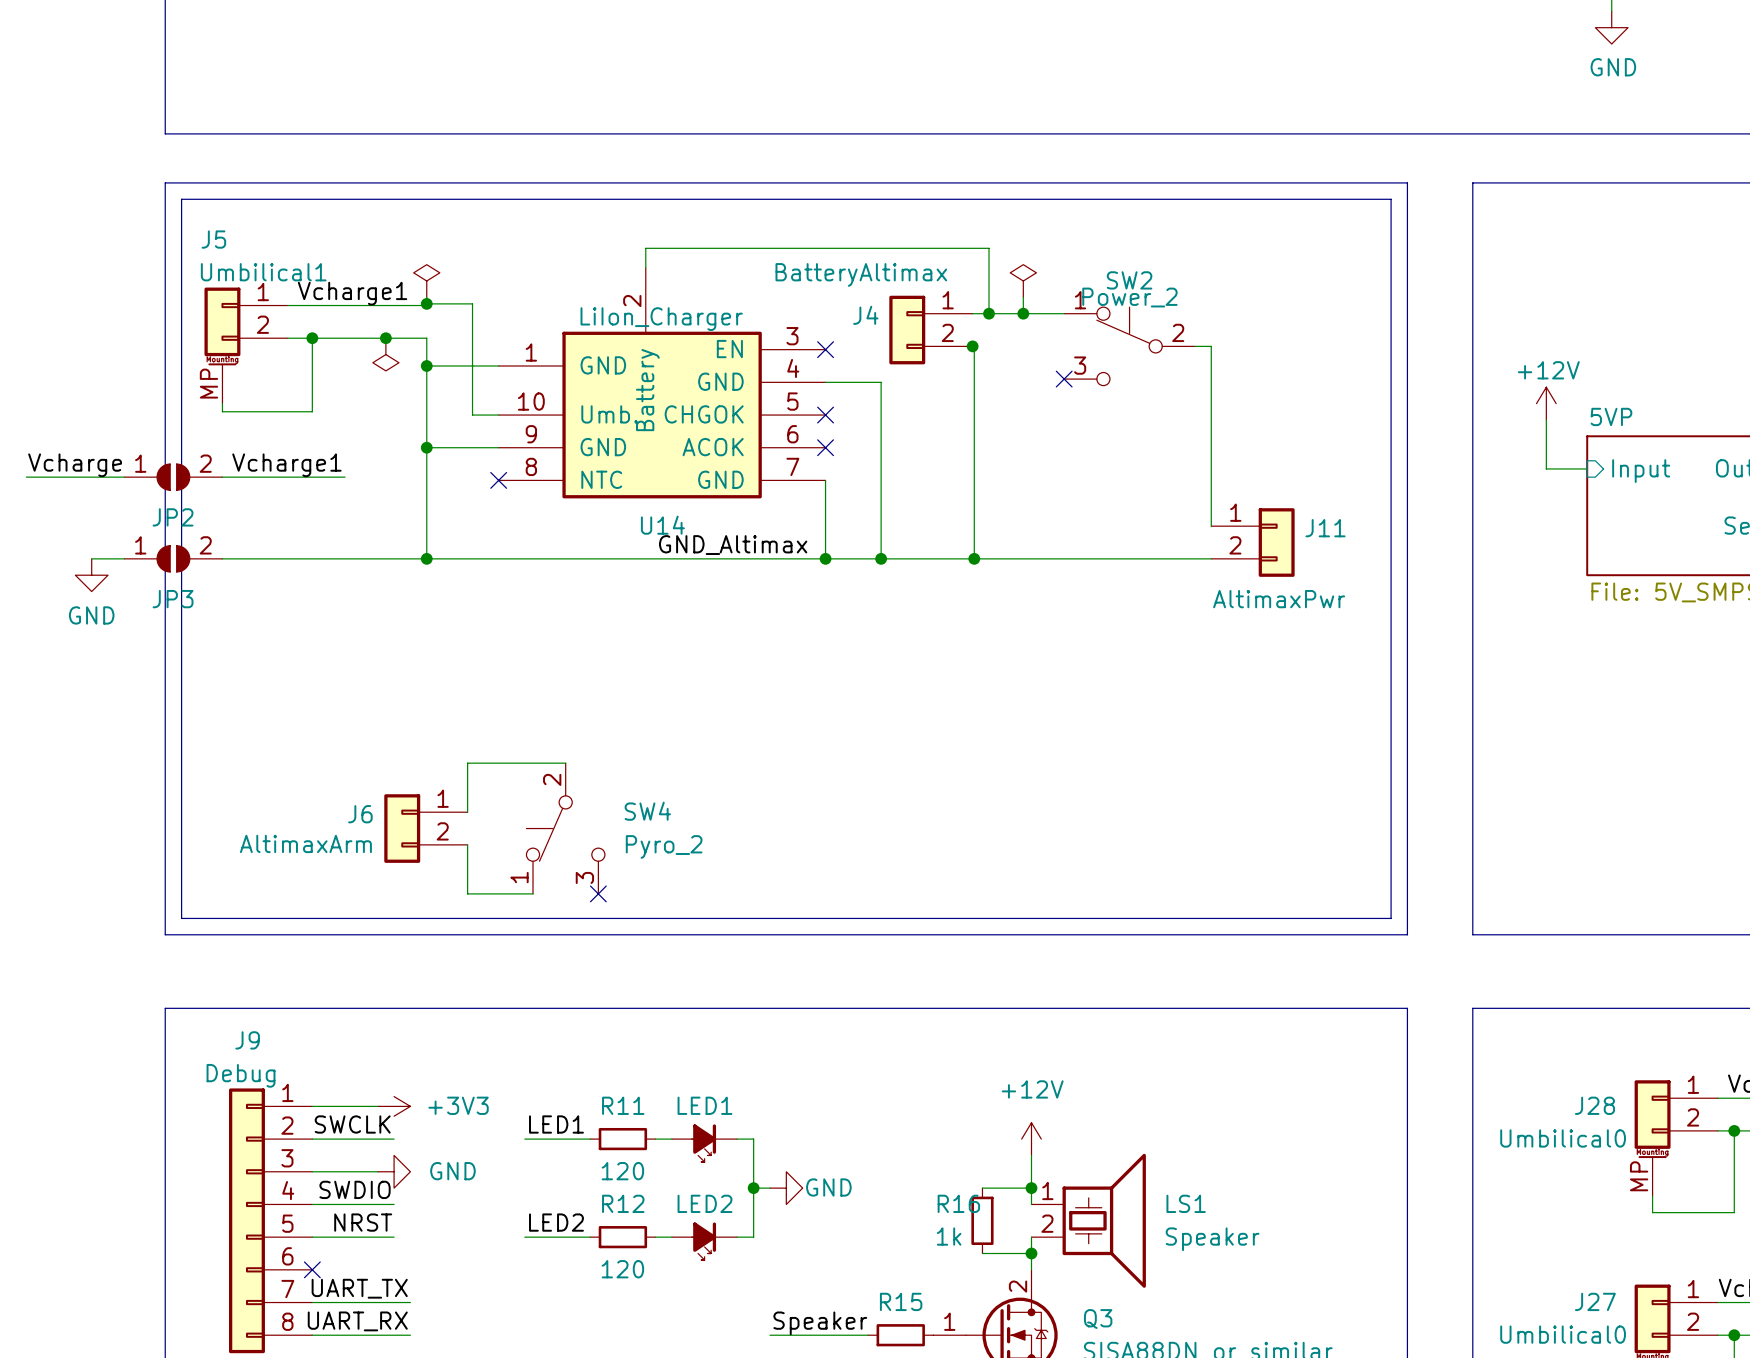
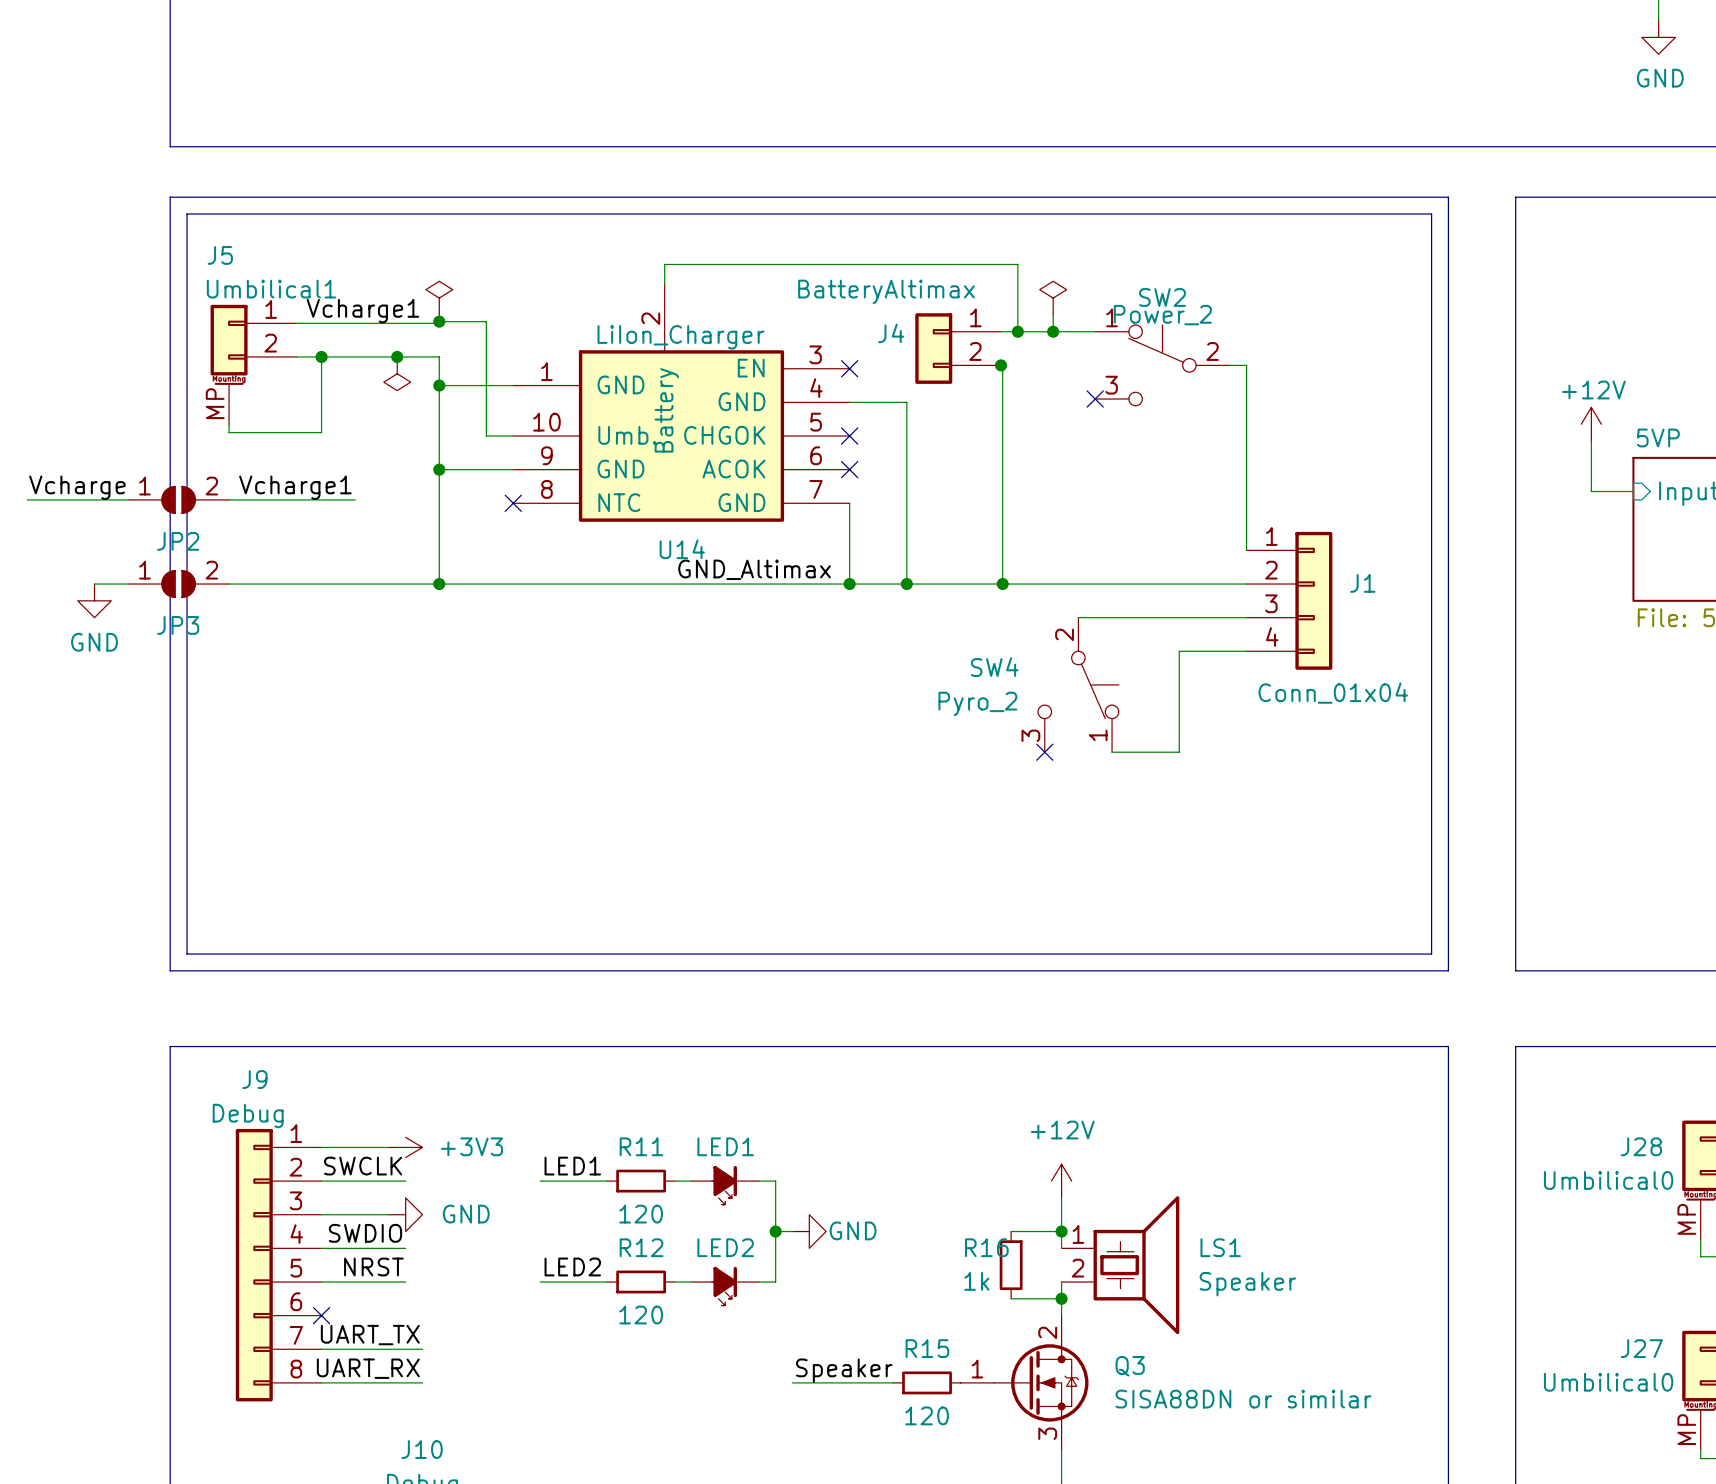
J11: AltimaxPwr (1252, 542) -> none
J1: none -> Conn_01x04 (1289, 600)
wire: none -> (1078, 617) (1246, 617)
wire: none -> (1246, 651) (1179, 651) (1179, 752) (1112, 752)
no-connect mark: none -> (1044, 752)
wire: (565, 763) (467, 763) (467, 812) -> none
J6: AltimaxArm (425, 828) -> none
SW4 flip: as is (565, 828) -> left-right (1078, 684)
SW4 position: (565, 828) -> (1078, 684)
wire: (467, 844) (467, 893) (532, 893) -> none
no-connect mark: (598, 893) -> none

